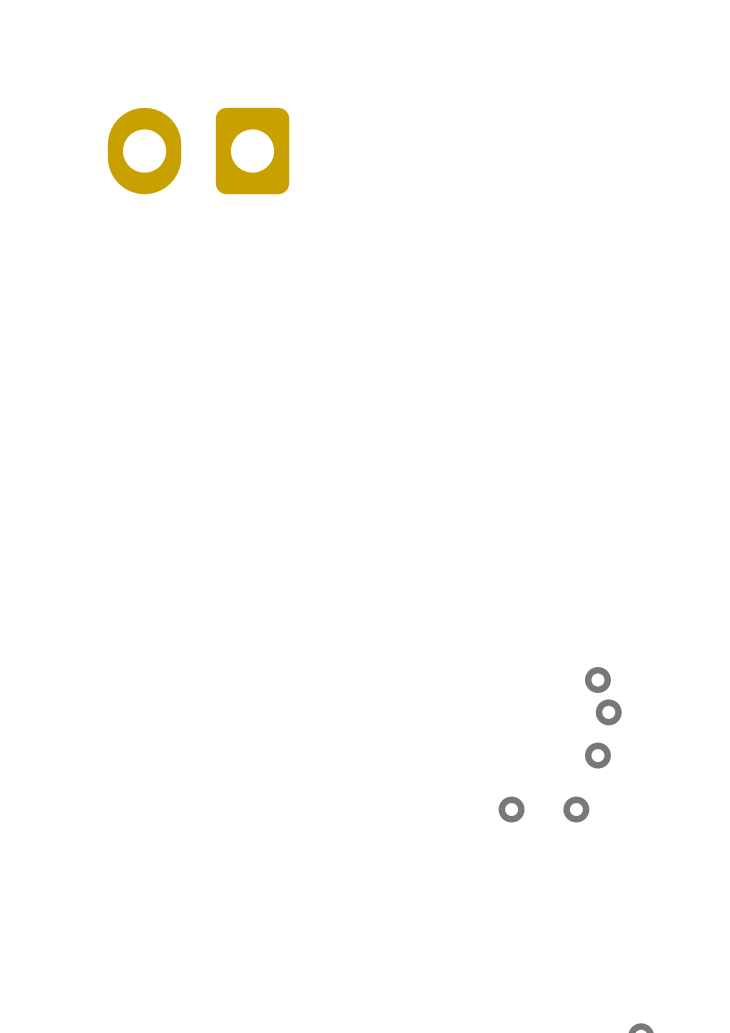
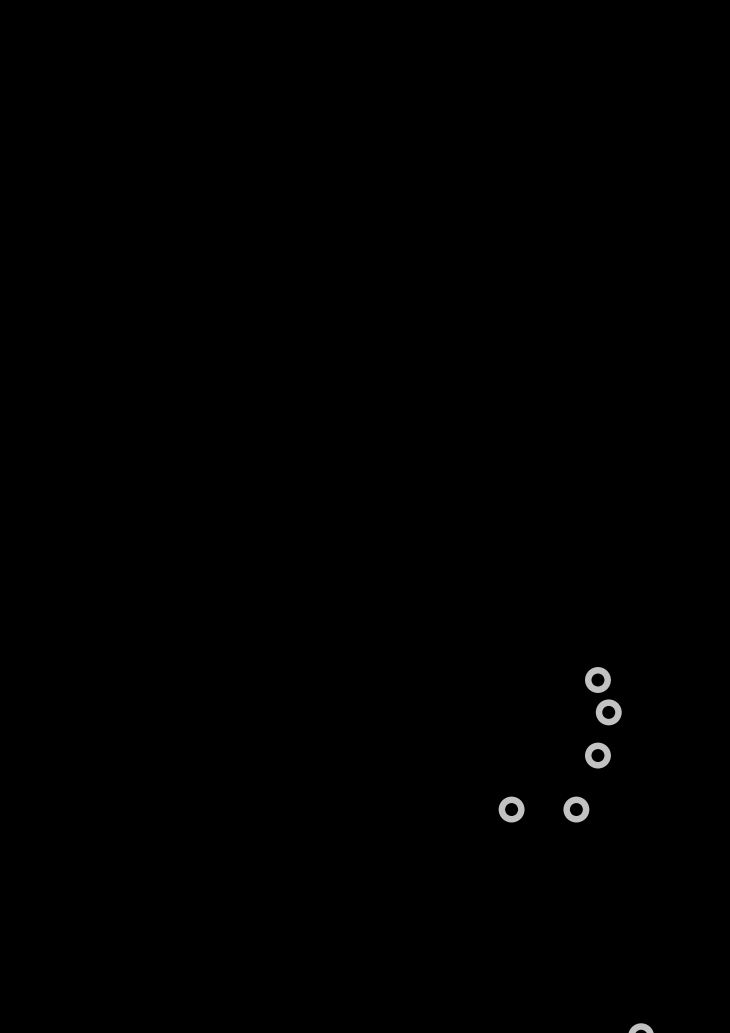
part: (198, 151) -> none

